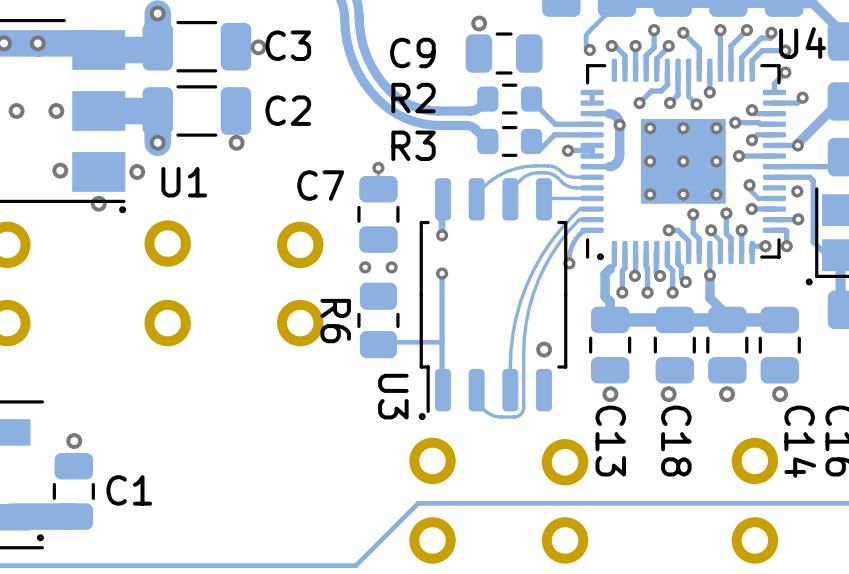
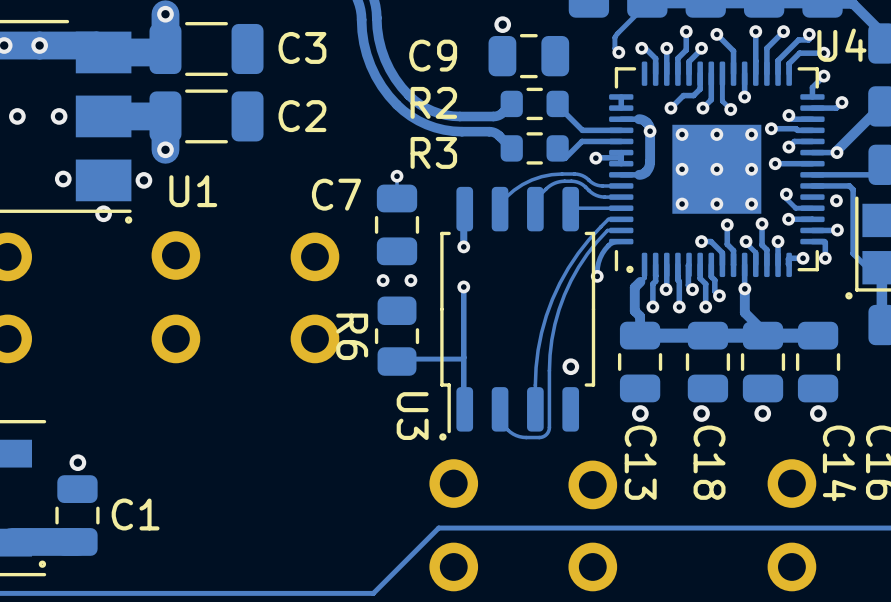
via: (258, 47) -> none
via: (236, 142) -> none

